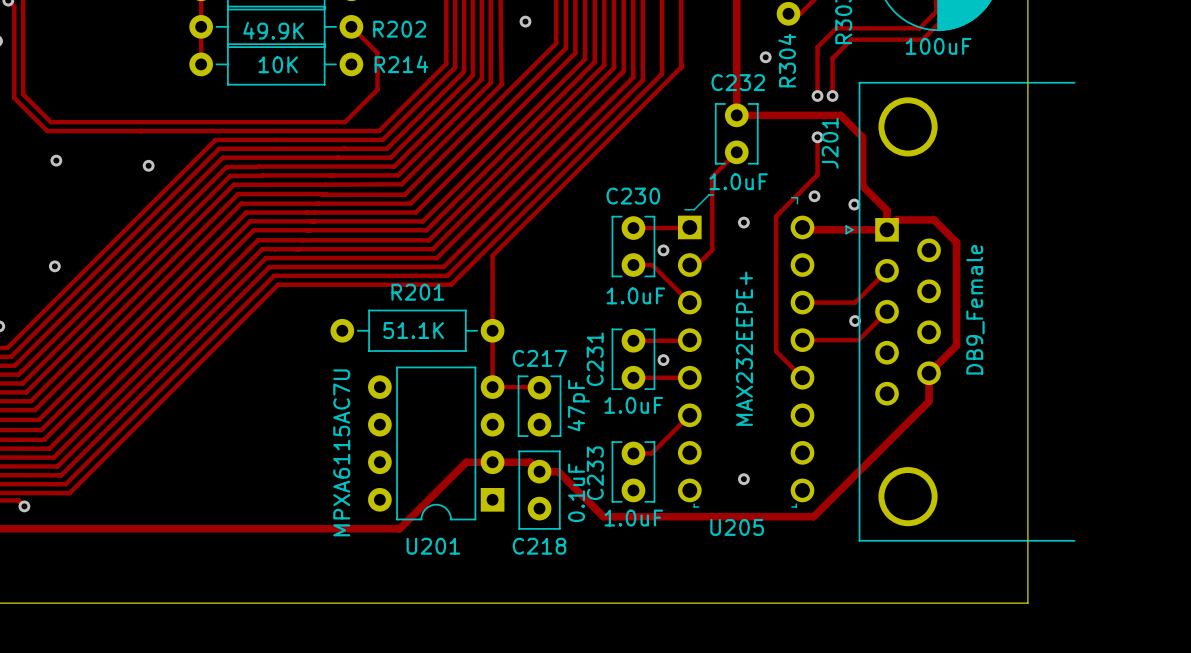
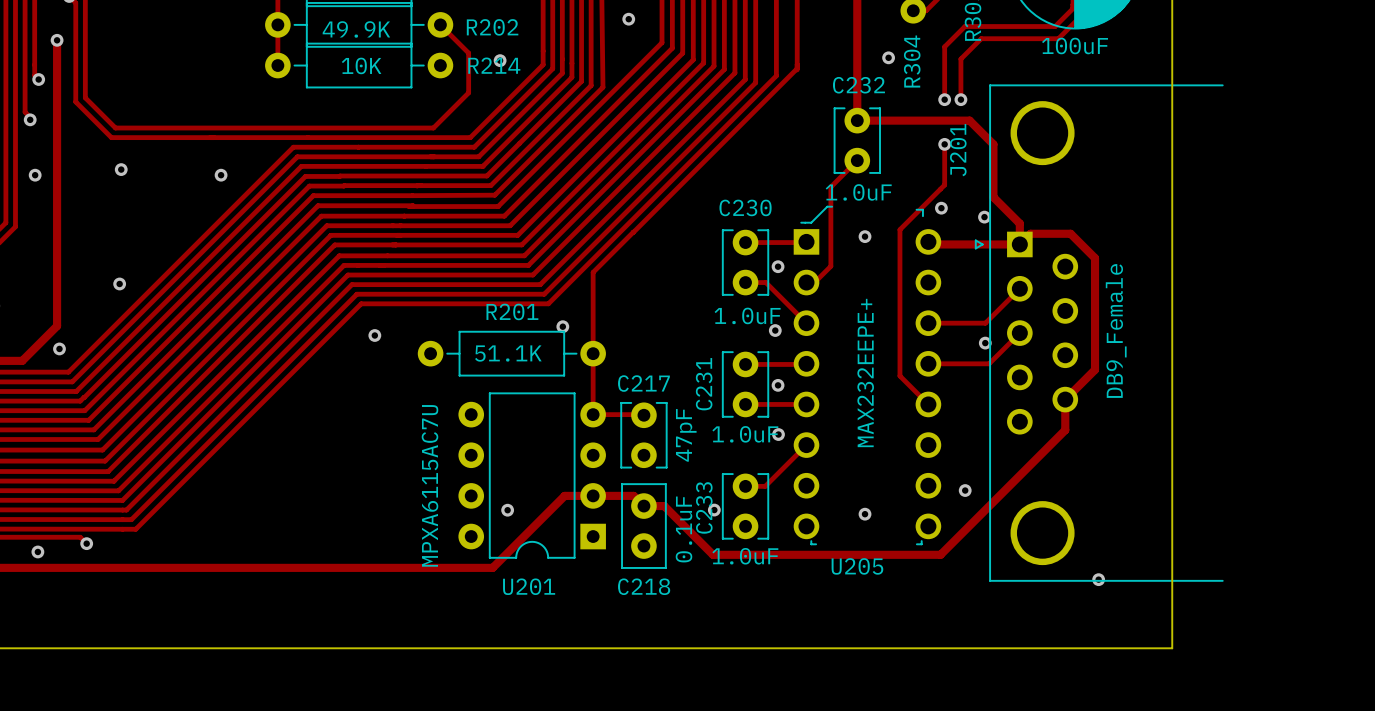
via: none -> (500, 60)
via: none -> (562, 326)
via: none -> (775, 330)
via: none -> (374, 335)
via: none -> (778, 434)
via: none -> (965, 490)
via: none -> (507, 510)
via: none -> (714, 510)
via: none -> (1098, 579)

